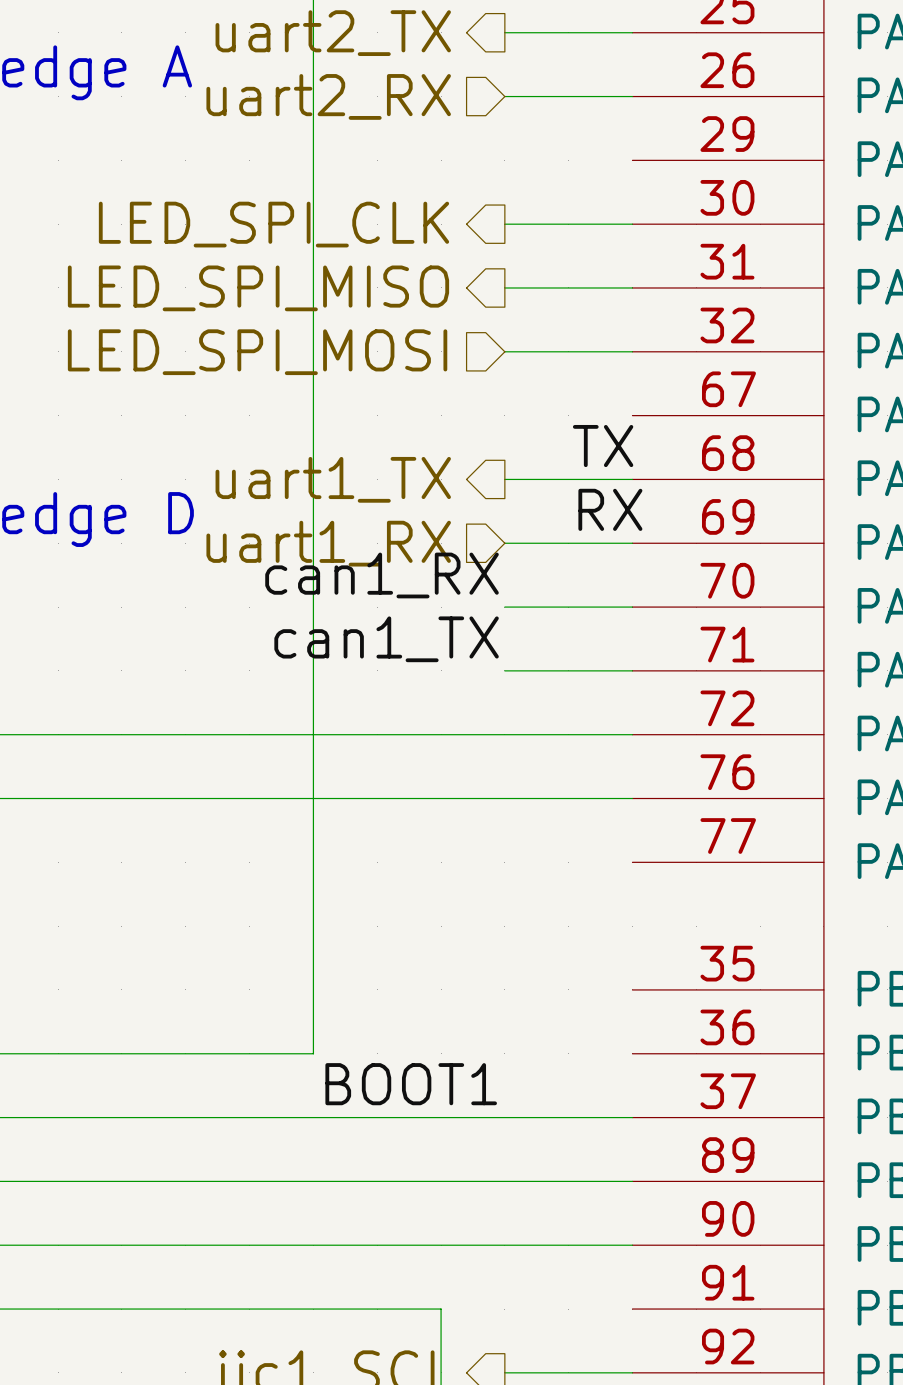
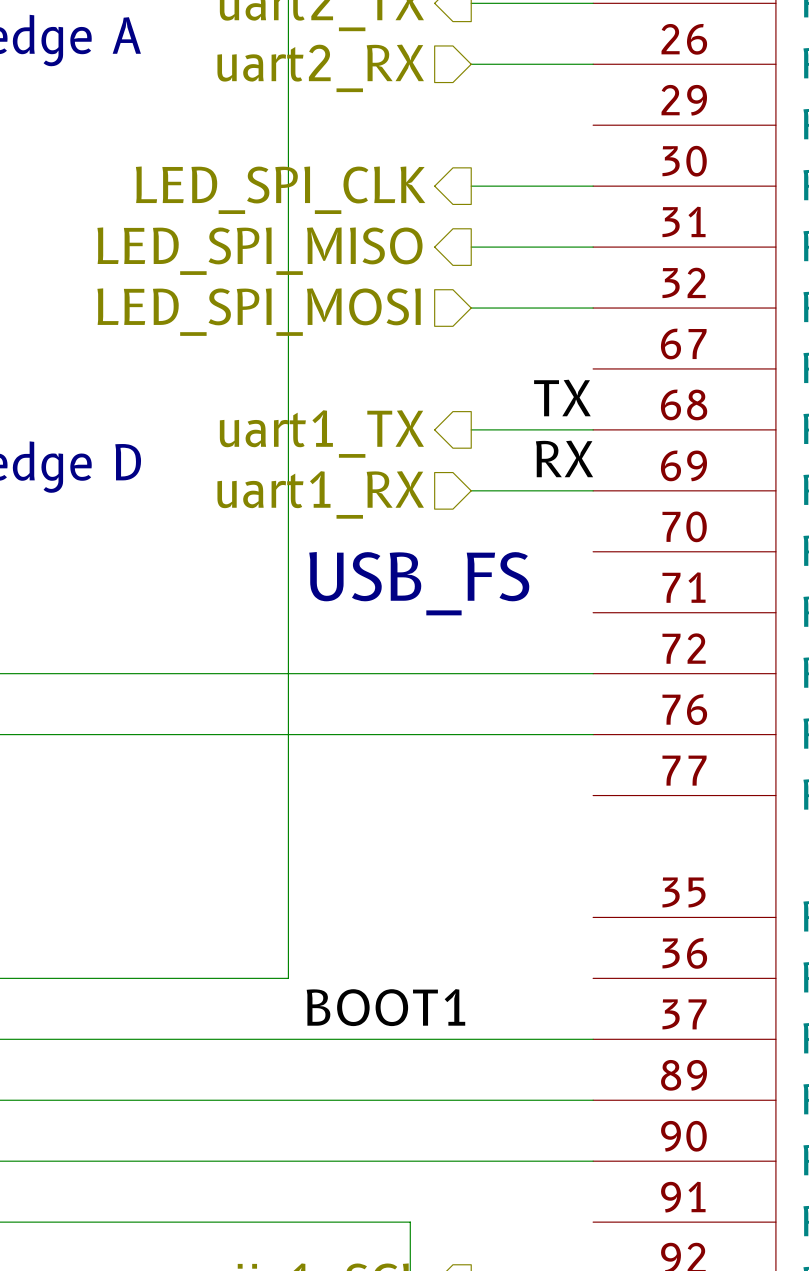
label: can1_RX (382, 575) -> none
wire: (504, 607) (632, 607) -> none
text: none -> USB_FS (419, 583)
label: can1_TX (386, 639) -> none
wire: (504, 670) (632, 670) -> none

